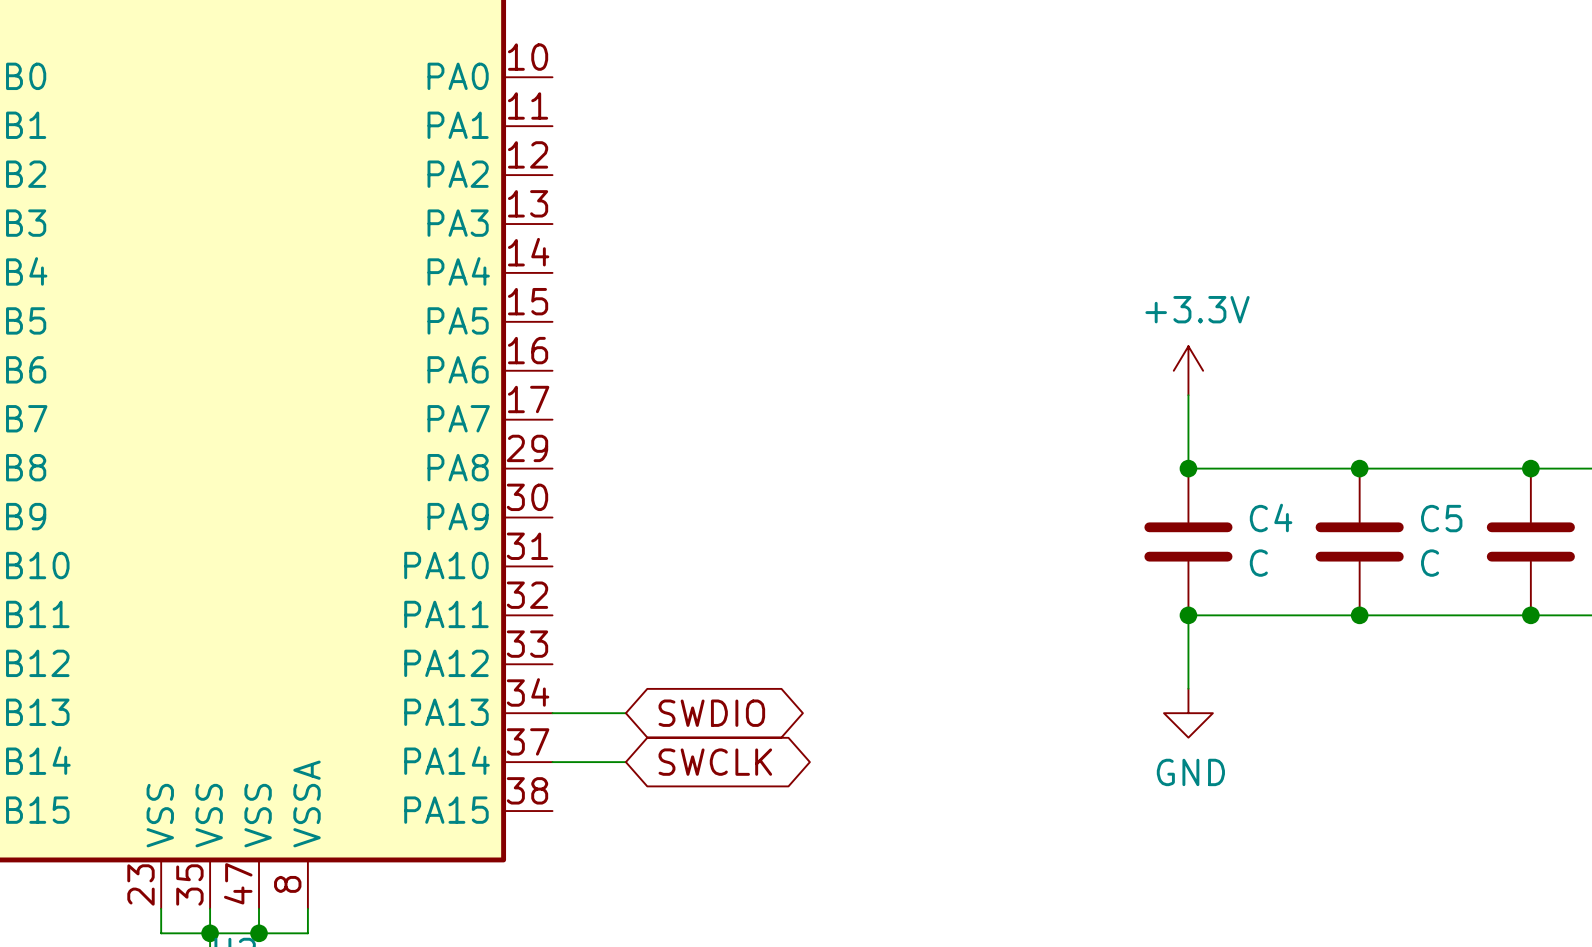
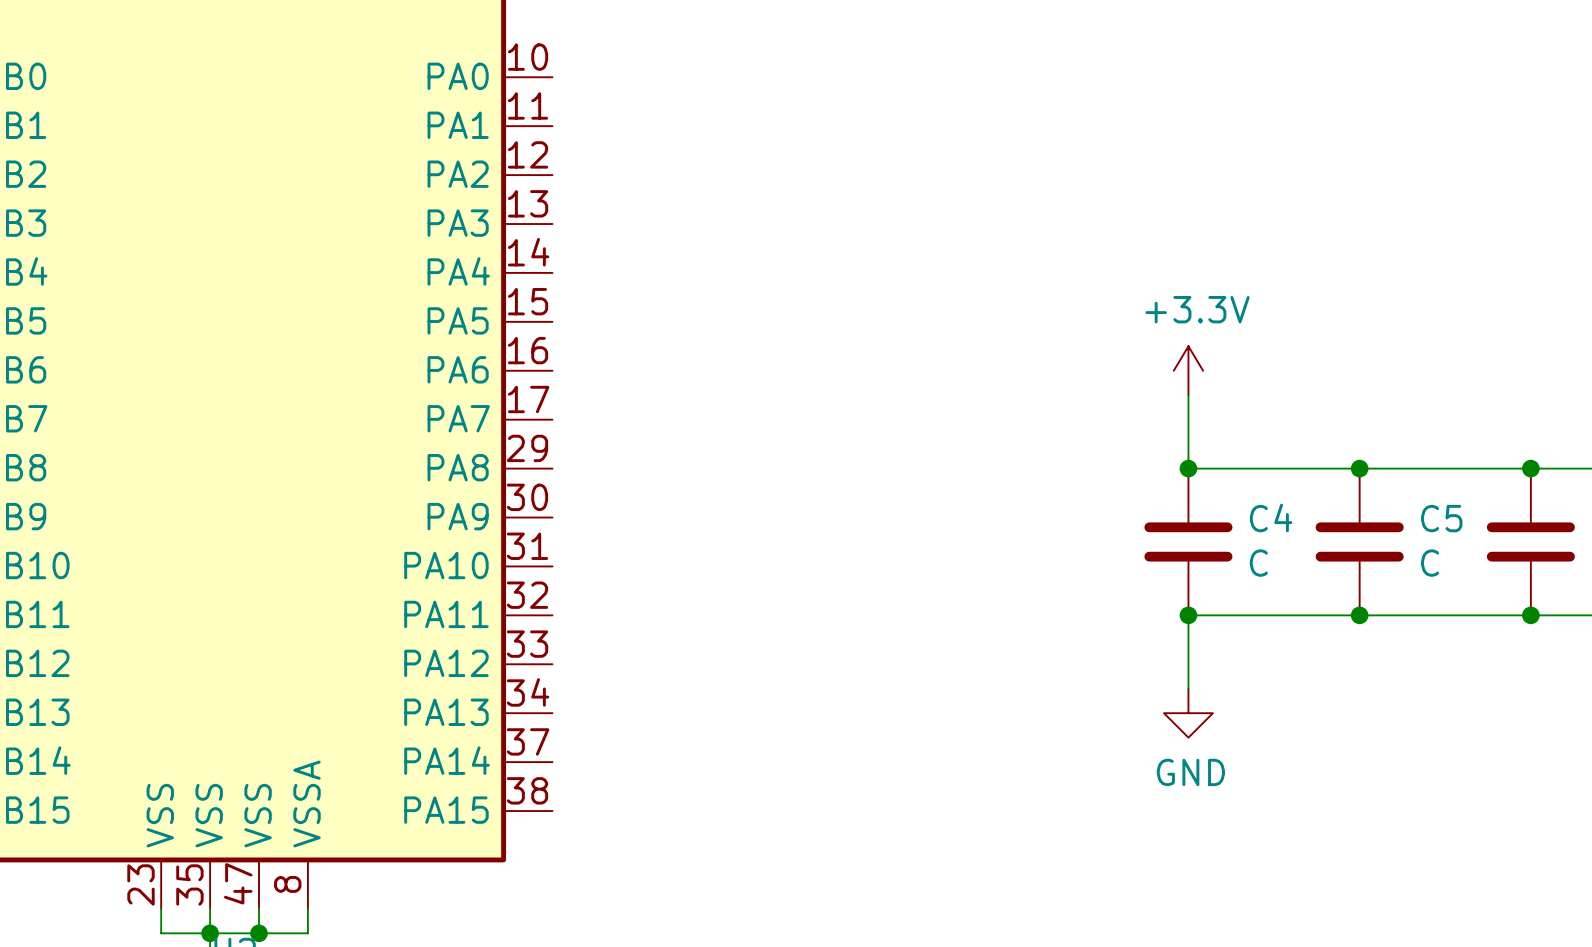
wire: (552, 713) (625, 713) -> none
global label: SWDIO (711, 713) -> none
wire: (552, 762) (625, 762) -> none
global label: SWCLK (715, 762) -> none

